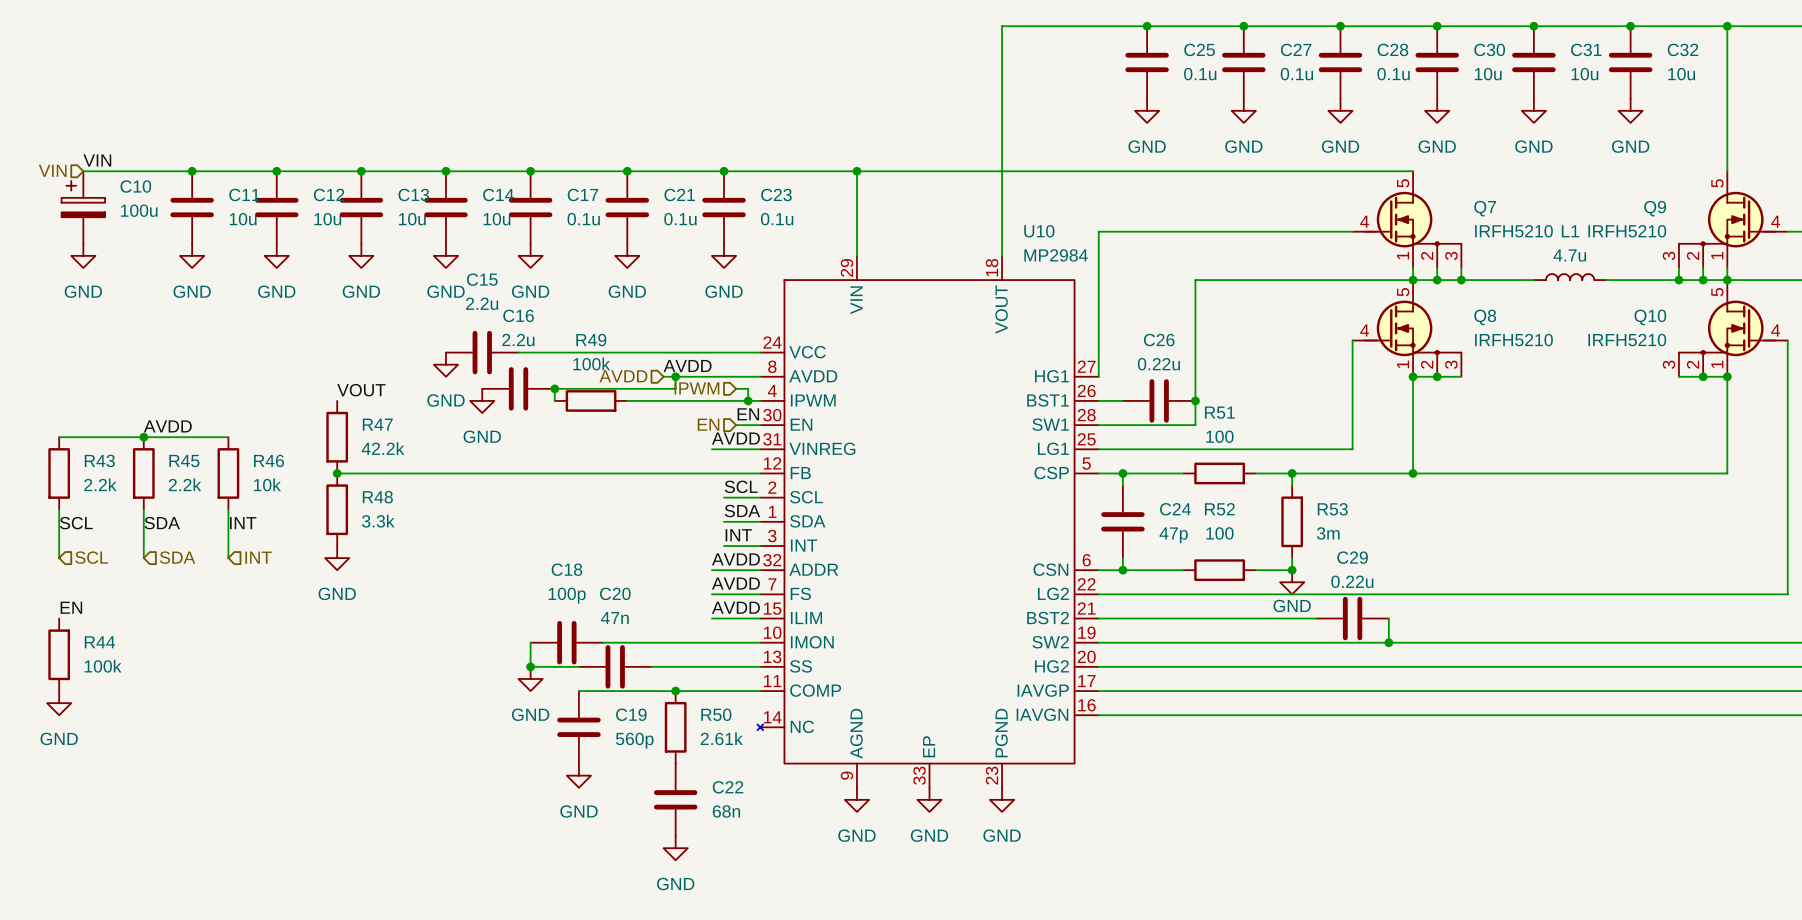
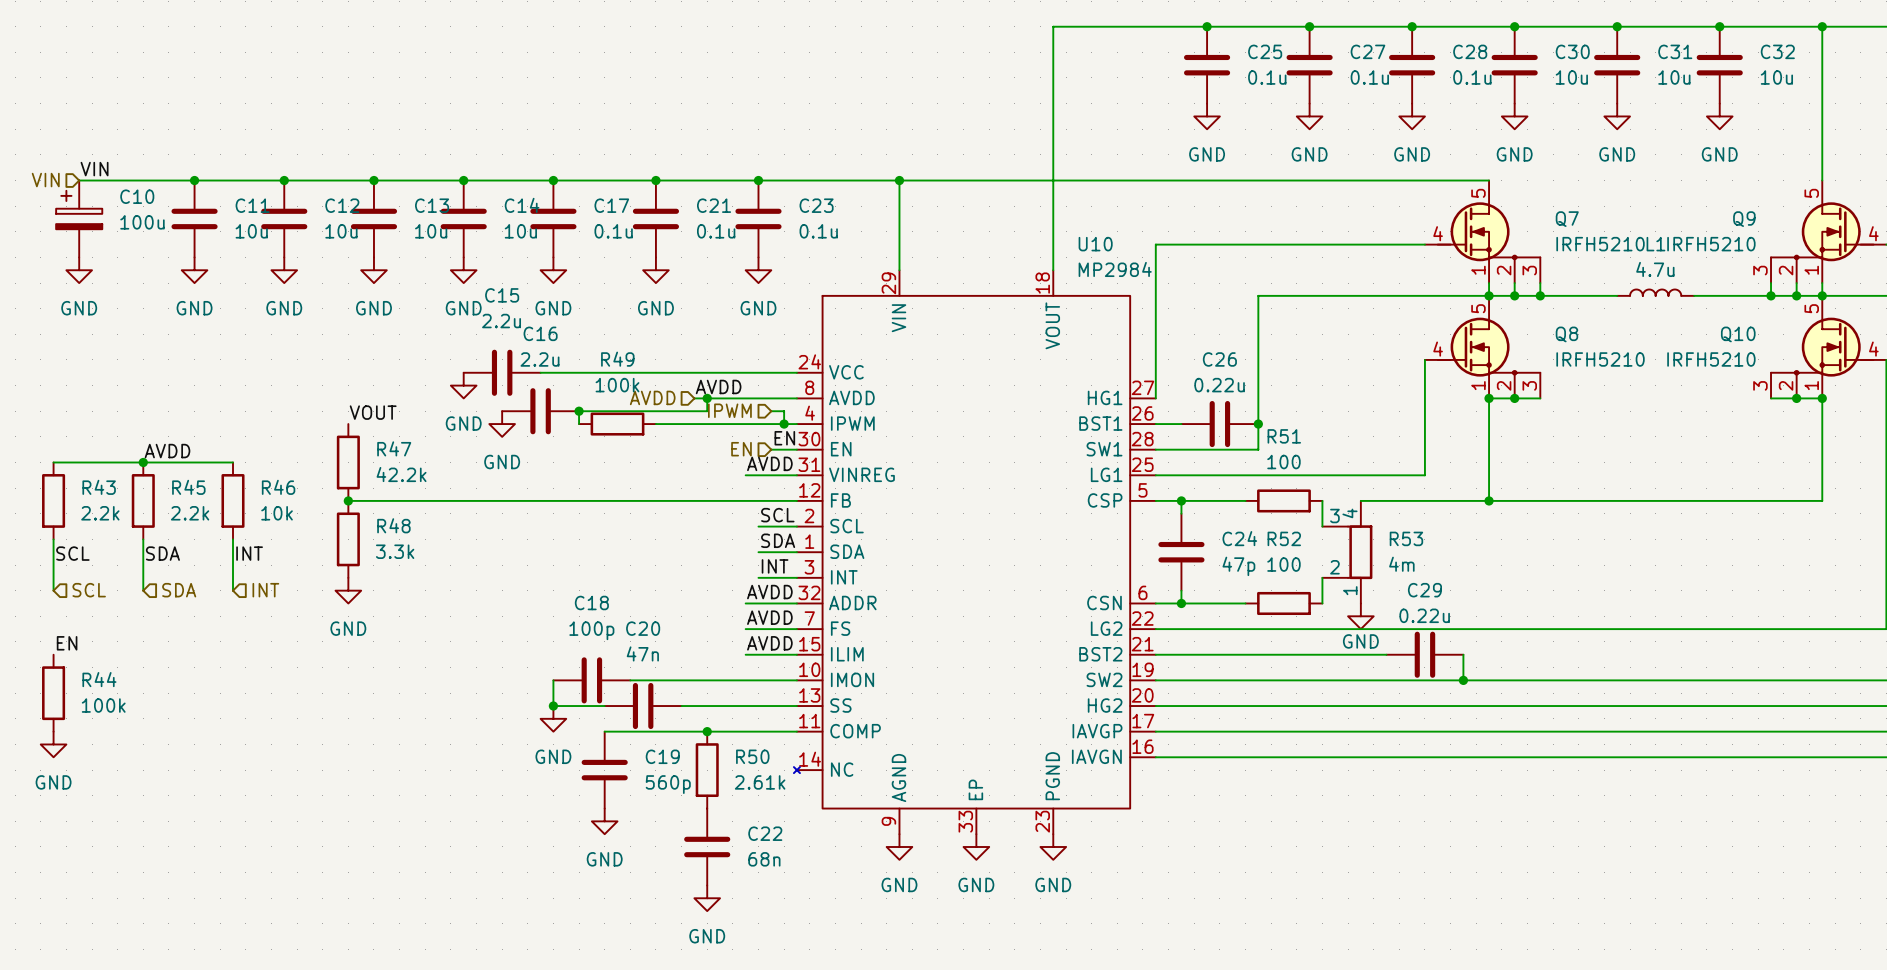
wire: (1255, 473) (1292, 473) (1292, 485) -> (1322, 500) (1322, 526)
junction: (1292, 473) -> none
R53 symbol: [1281, 485, 1304, 559] -> [1322, 500, 1373, 604]
R53 value: 3m (1328, 533) -> 4m (1401, 564)
wire: (1292, 558) (1292, 570) (1255, 570) -> (1322, 577) (1322, 603)
junction: (1292, 570) -> none

